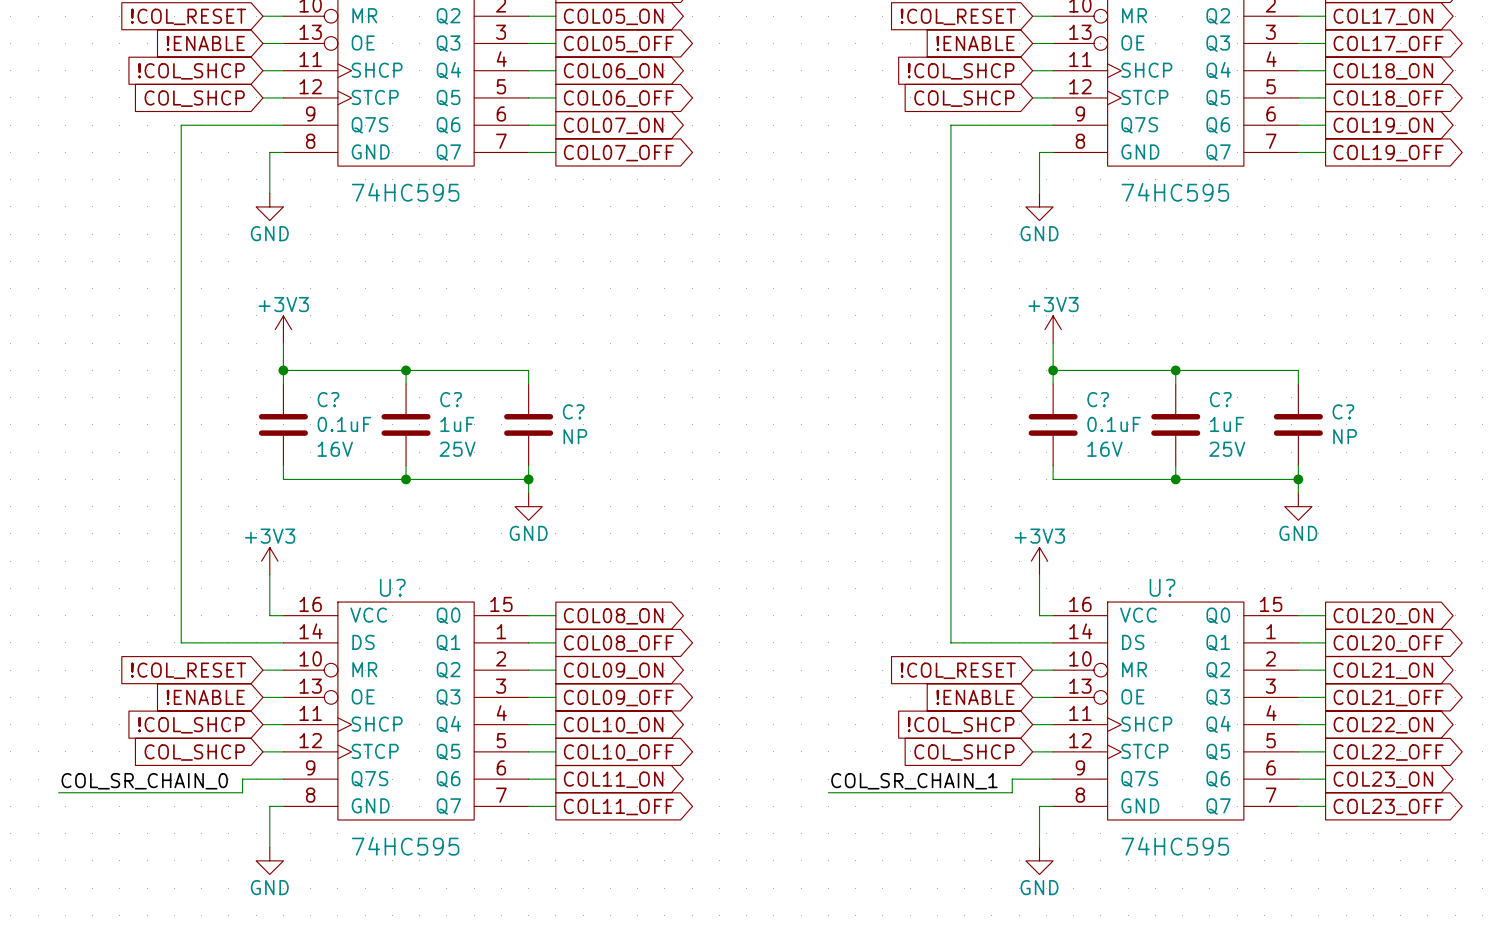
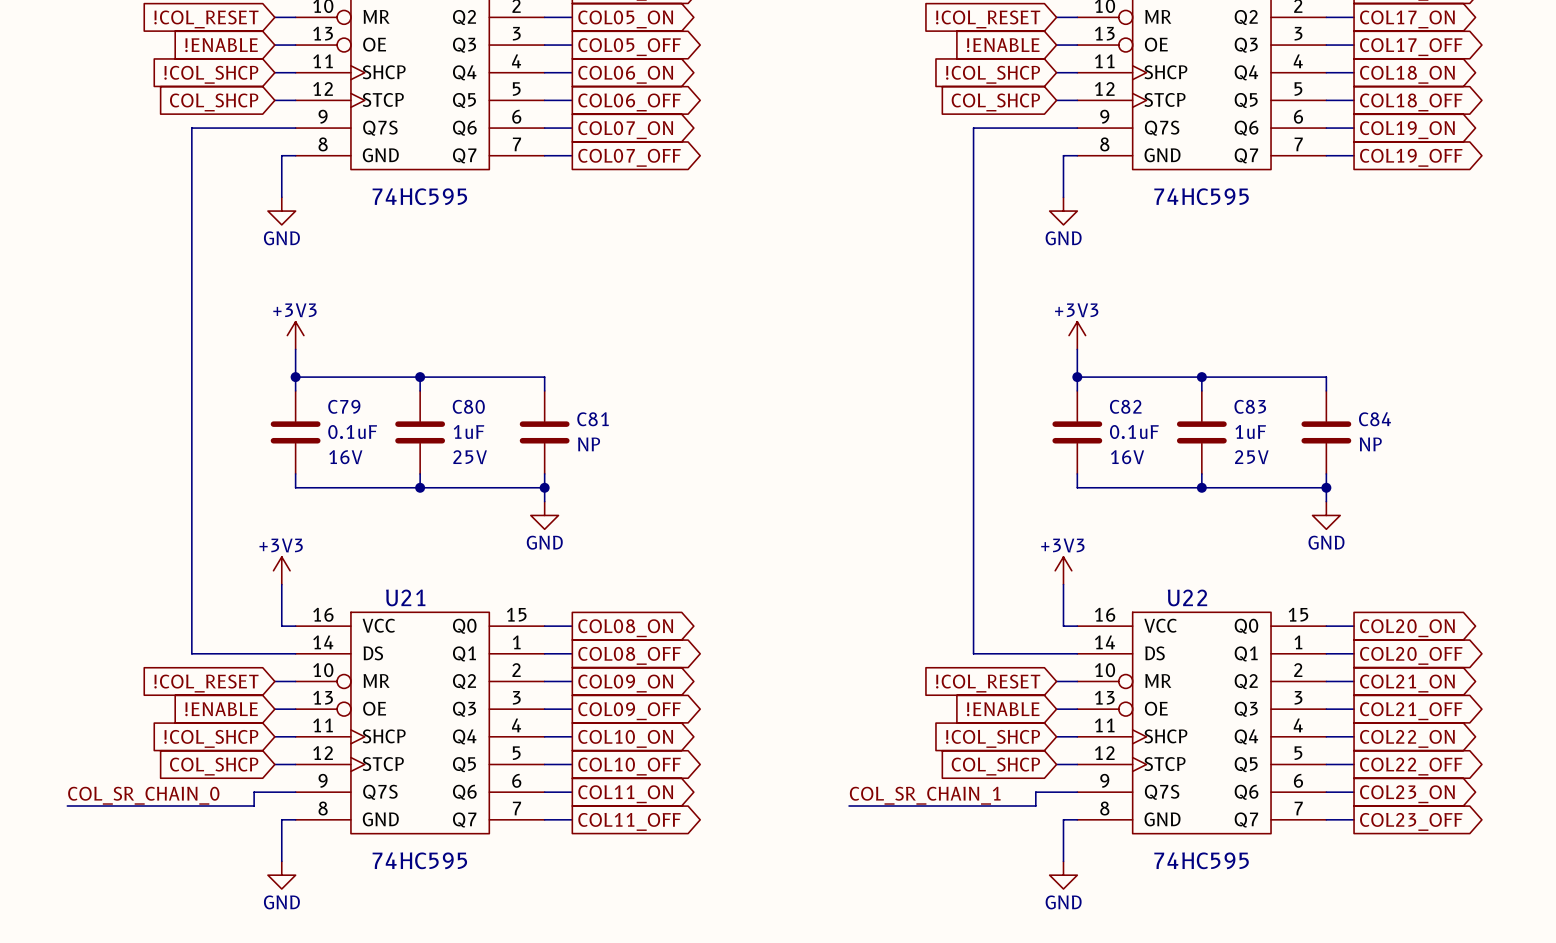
C? name: C? (328, 399) -> C79 (344, 406)
C? name: C? (451, 399) -> C80 (468, 406)
C? name: C? (1098, 399) -> C82 (1125, 406)
C? name: C? (1220, 399) -> C83 (1250, 406)
C? name: C? (573, 411) -> C81 (593, 419)
C? name: C? (1343, 411) -> C84 (1374, 419)
U? name: U? (392, 587) -> U21 (405, 597)
U? name: U? (1162, 587) -> U22 (1187, 597)

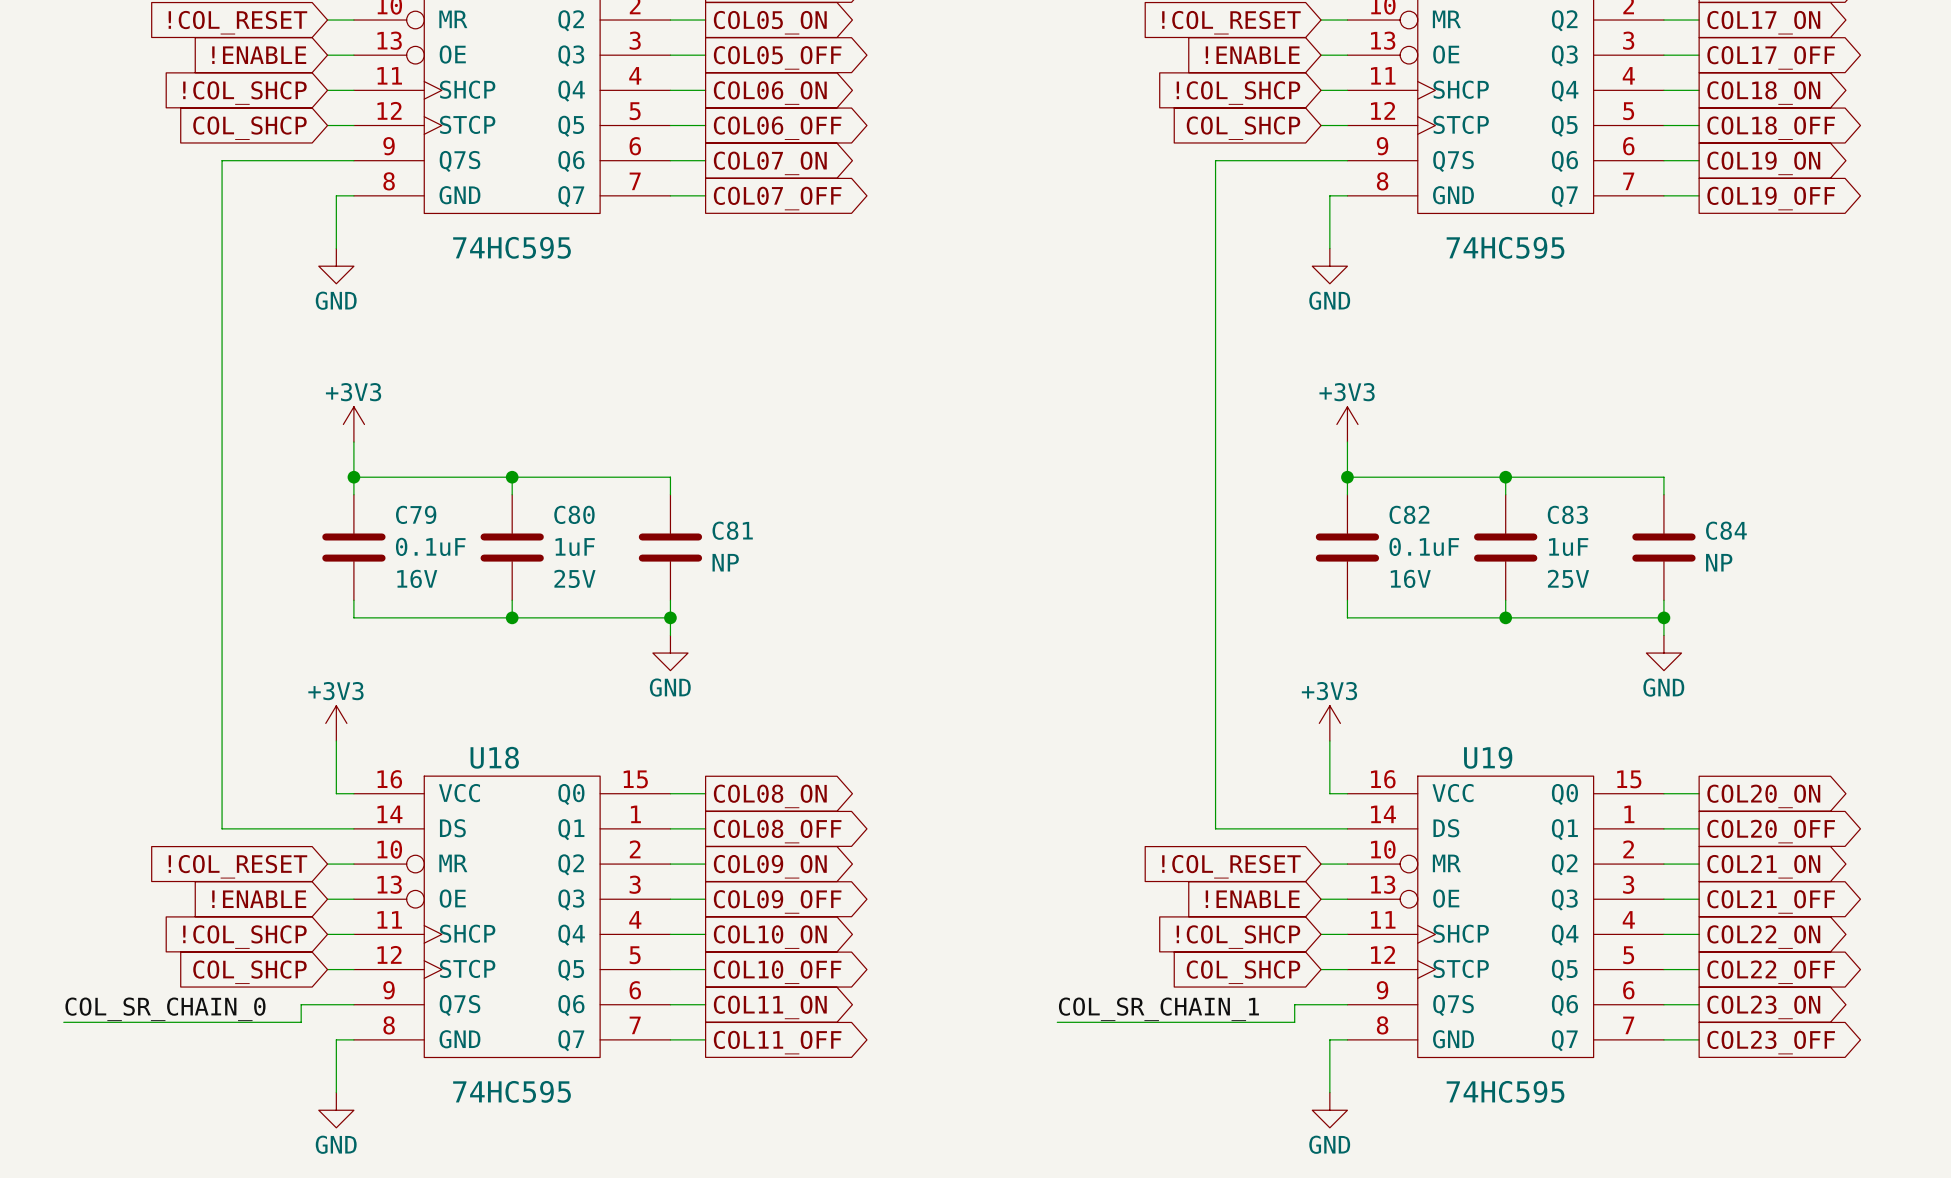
U21 name: U21 (405, 597) -> U18 (494, 757)
U22 name: U22 (1187, 597) -> U19 (1488, 757)

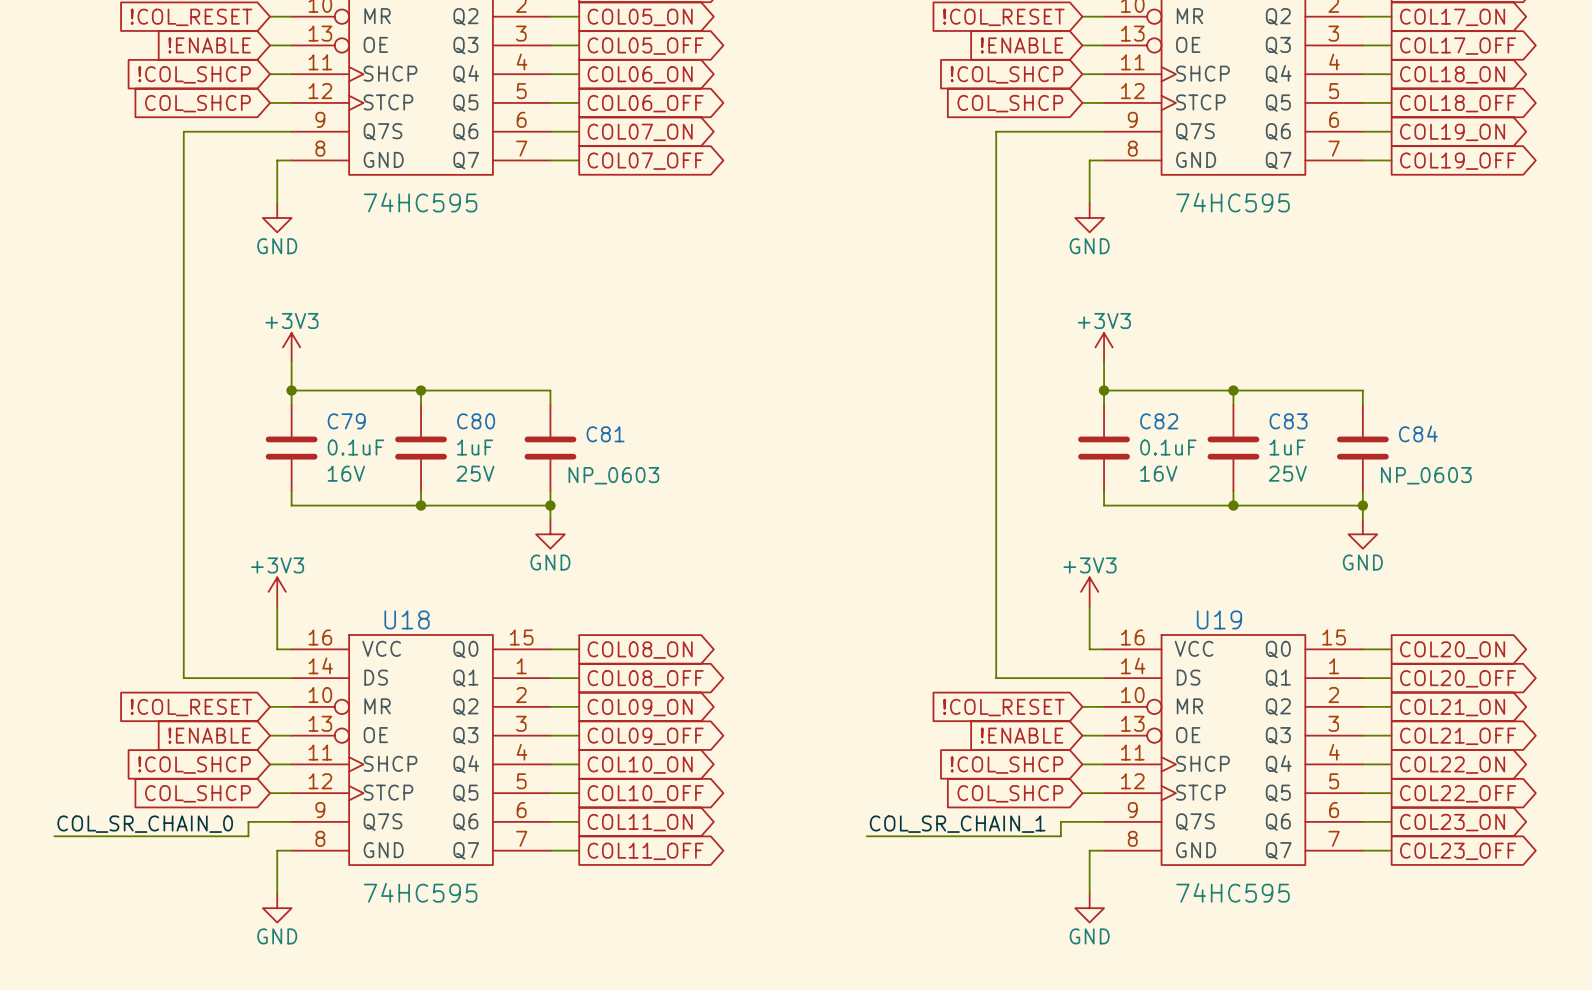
C81 text: NP (725, 562) -> none
C84 text: NP (1719, 562) -> none
C81 value: none -> NP_0603 (613, 475)
C84 value: none -> NP_0603 (1426, 475)

